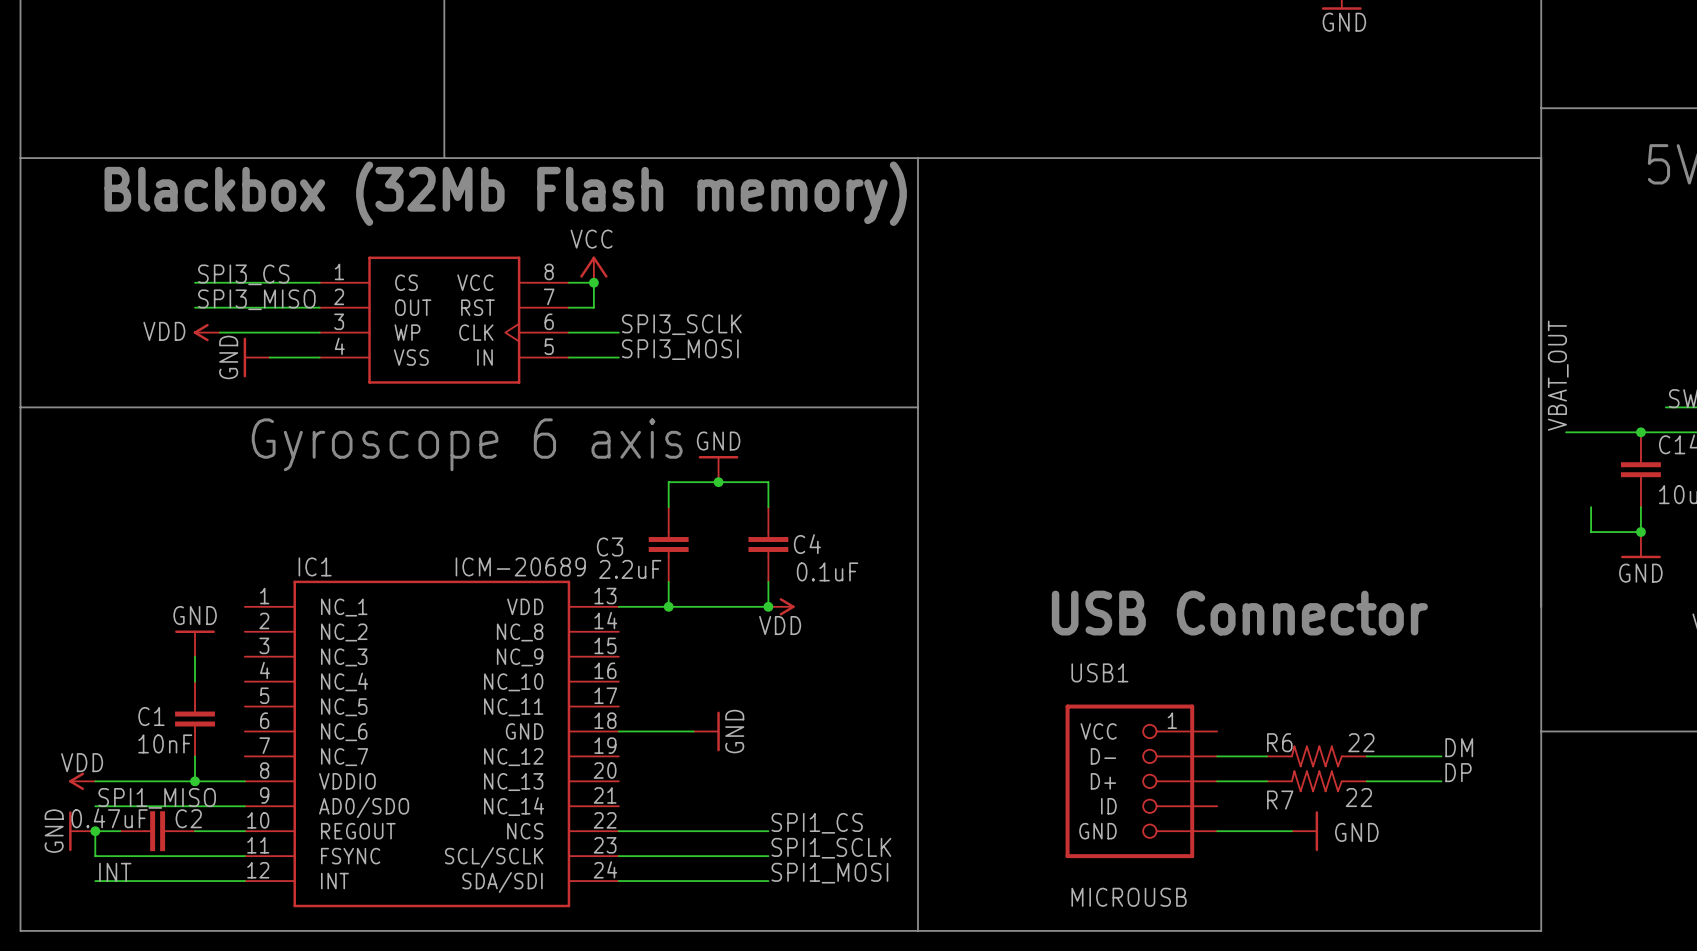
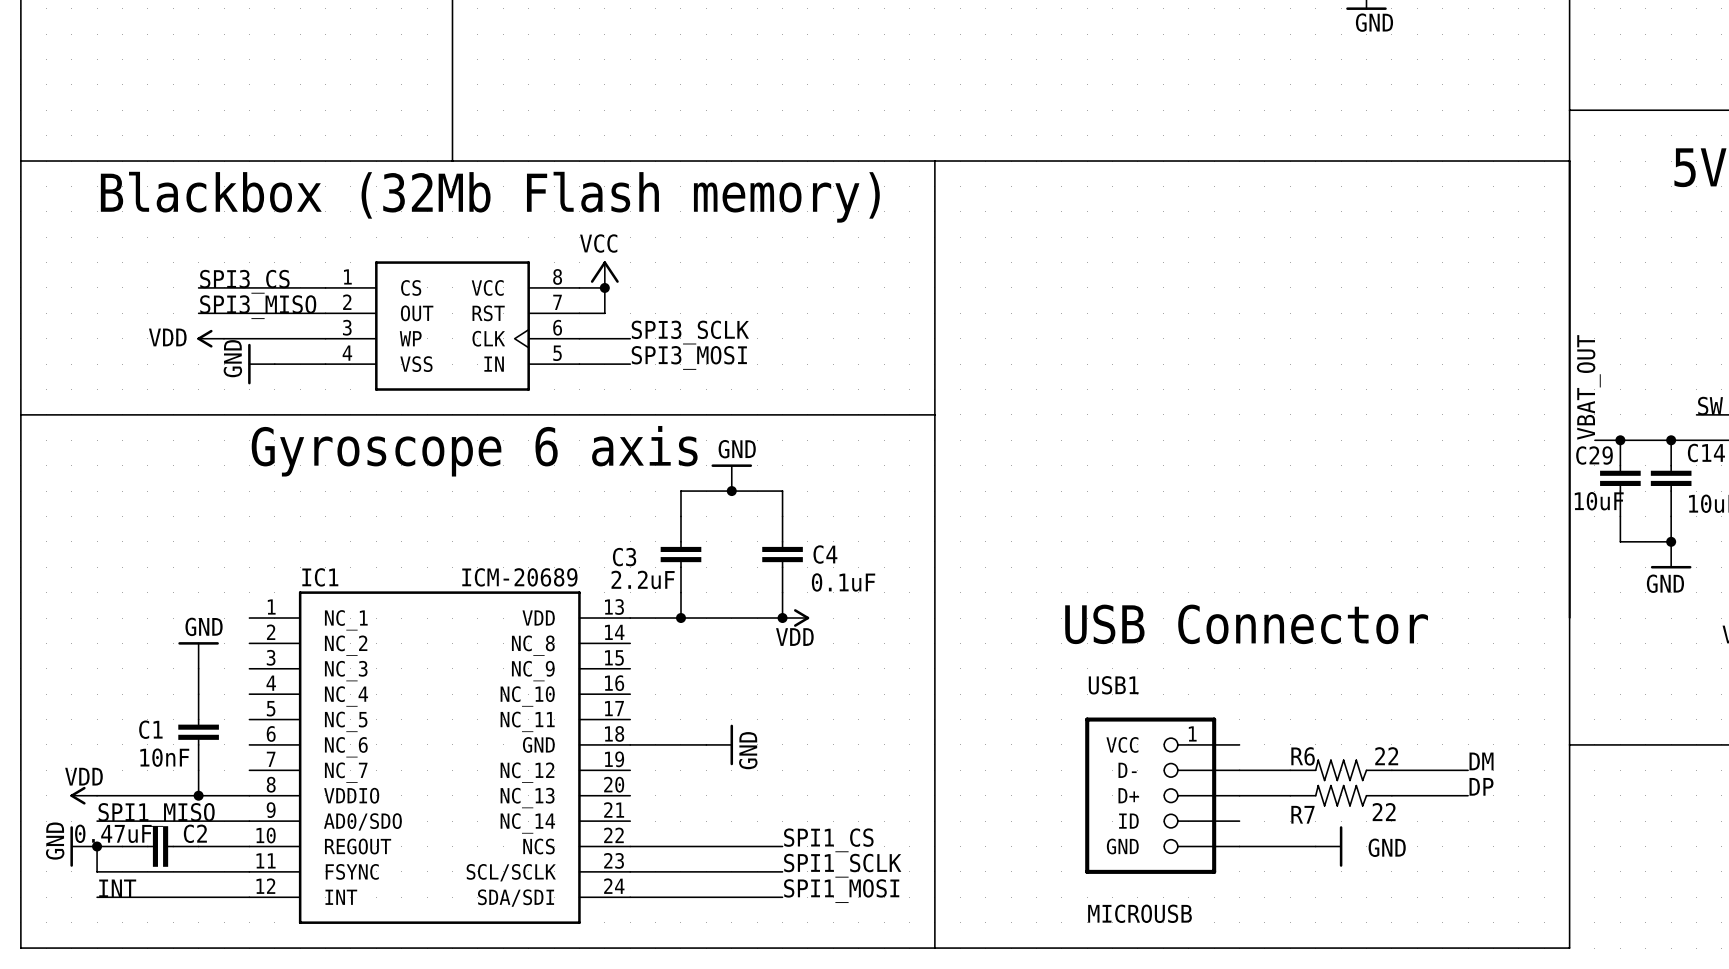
junction: none -> (1620, 440)
C29: none -> 10uF (1620, 478)

